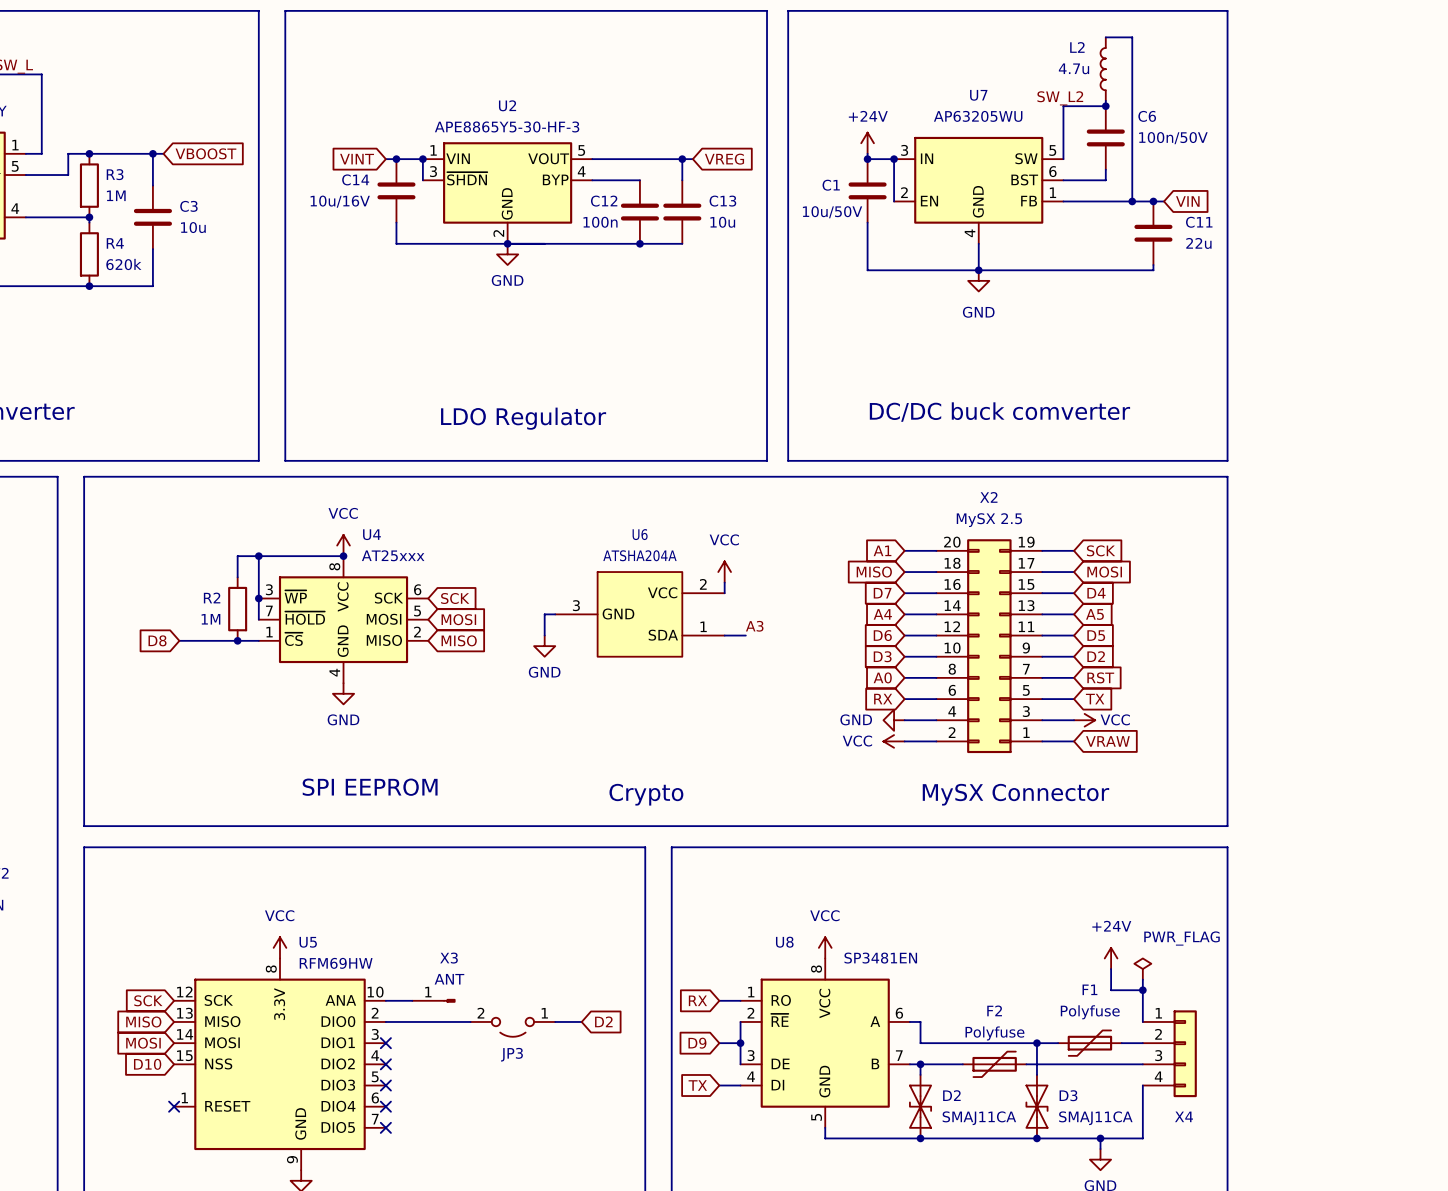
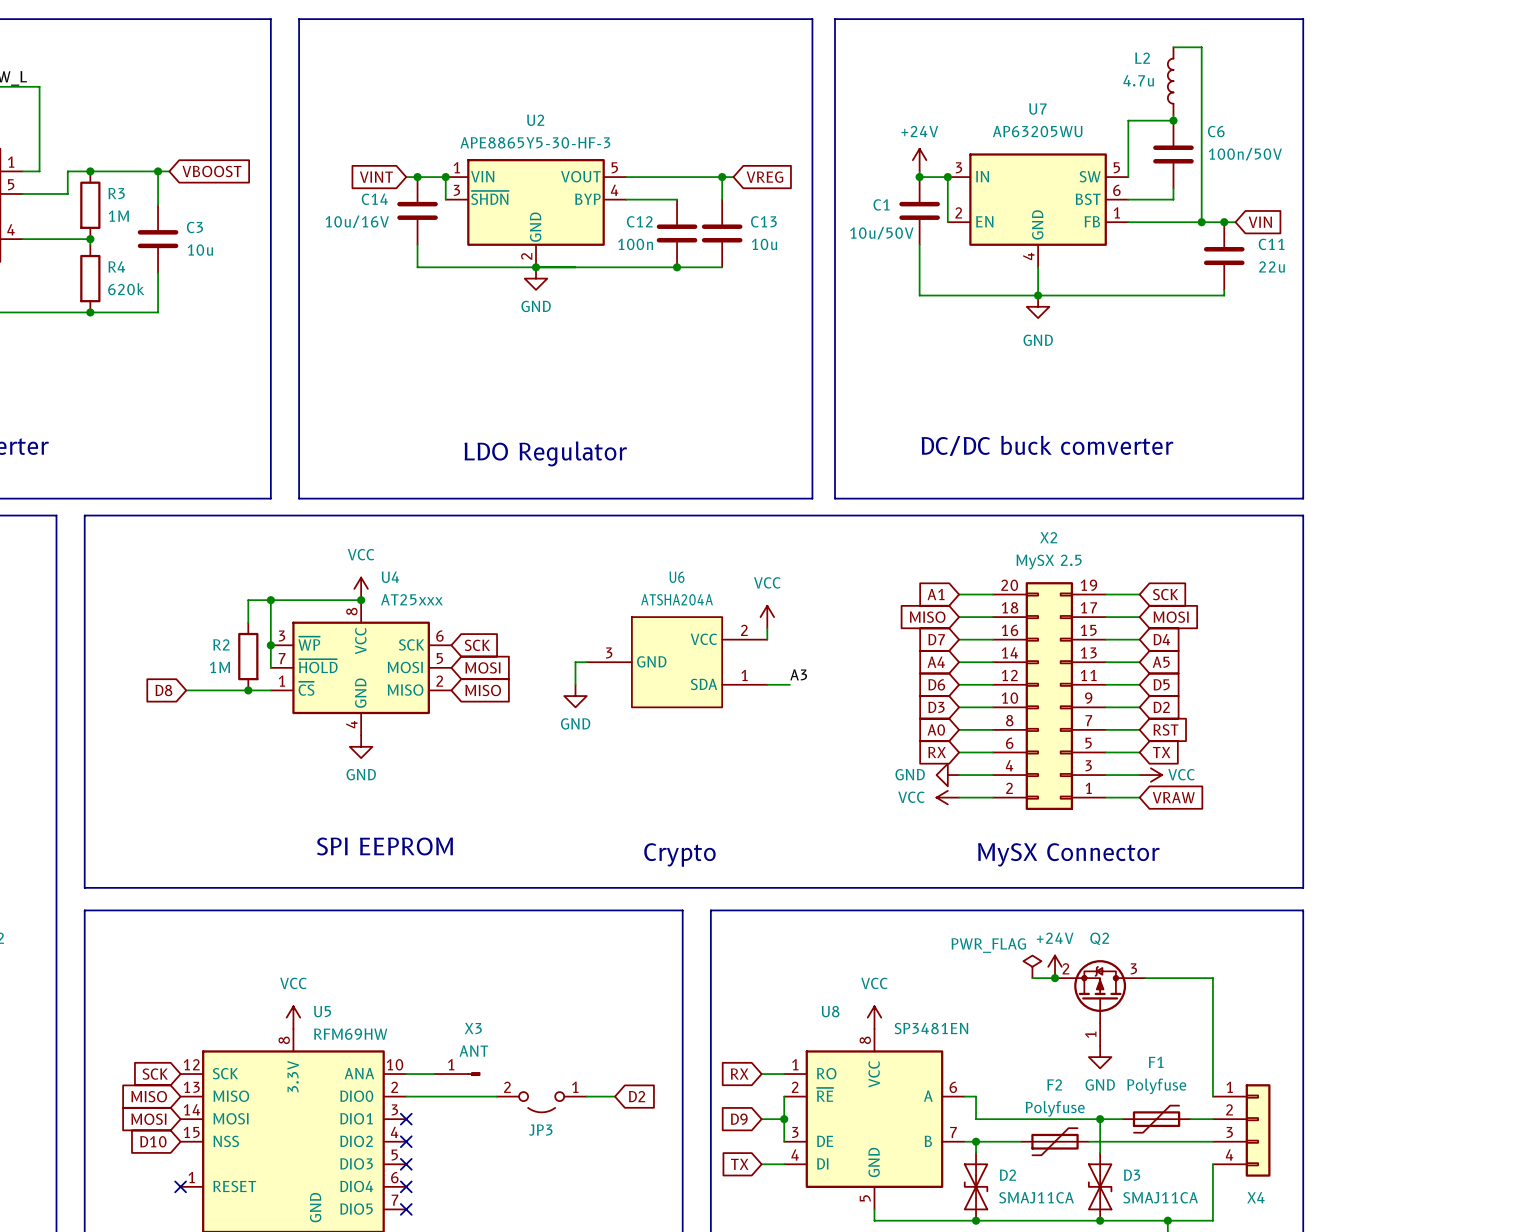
label: SW_L2 (1060, 98) -> none
wire: none -> (1032, 978) (1055, 978)
junction: none -> (1055, 978)
wire: none -> (1145, 978) (1212, 978) (1212, 1051)
power symbol text position: +24V (1111, 926) -> +24V (1055, 938)
Q2: none -> (1100, 1002)
power symbol text position: PWR_FLAG (1182, 938) -> PWR_FLAG (988, 945)
power symbol position: +24V (1111, 958) -> +24V (1055, 966)
wire: (1111, 969) (1111, 990) (1142, 990) -> none
power symbol position: PWR_FLAG (1142, 969) -> PWR_FLAG (1032, 966)
power symbol: none -> GND (1100, 1057)
junction: (1142, 990) -> none

